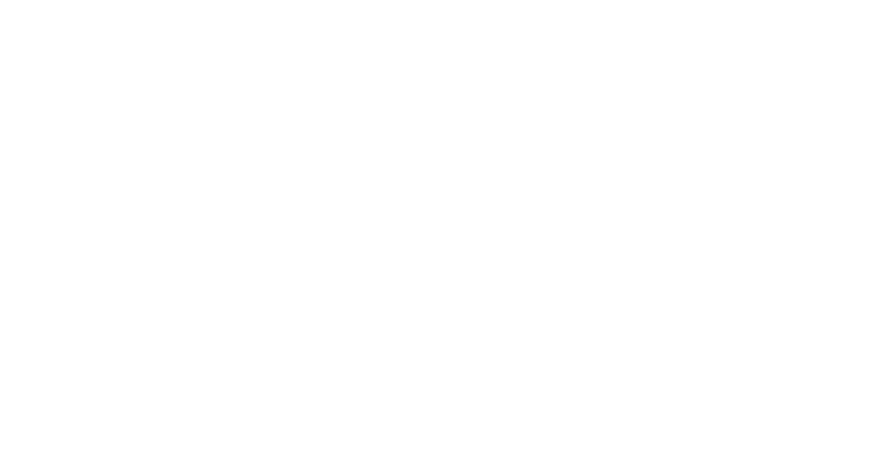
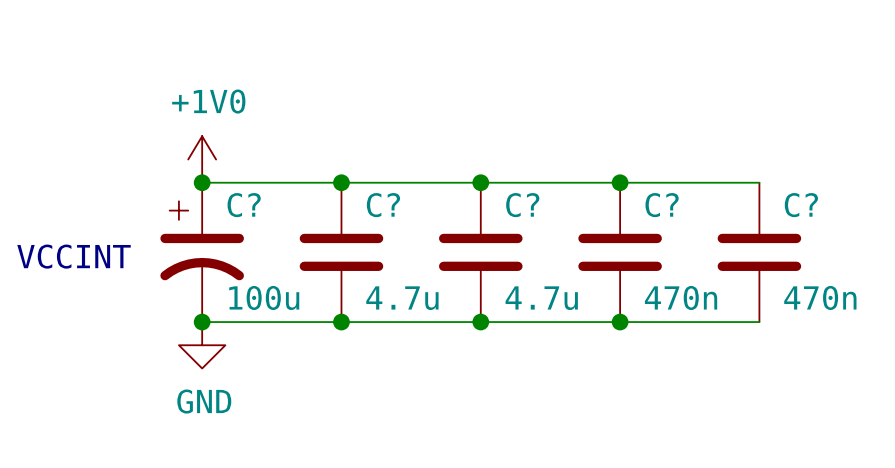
power symbol: none -> +1V0 (202, 159)
wire: none -> (202, 182) (759, 182)
junction: none -> (202, 182)
junction: none -> (341, 182)
junction: none -> (480, 182)
junction: none -> (620, 182)
C?: none -> 100u (202, 252)
C?: none -> 4.7u (341, 252)
C?: none -> 4.7u (480, 252)
C?: none -> 470n (620, 252)
C?: none -> 470n (759, 252)
text: none -> VCCINT (74, 256)
wire: none -> (202, 322) (759, 322)
junction: none -> (202, 322)
junction: none -> (341, 322)
junction: none -> (480, 322)
junction: none -> (620, 322)
power symbol: none -> GND (202, 345)

